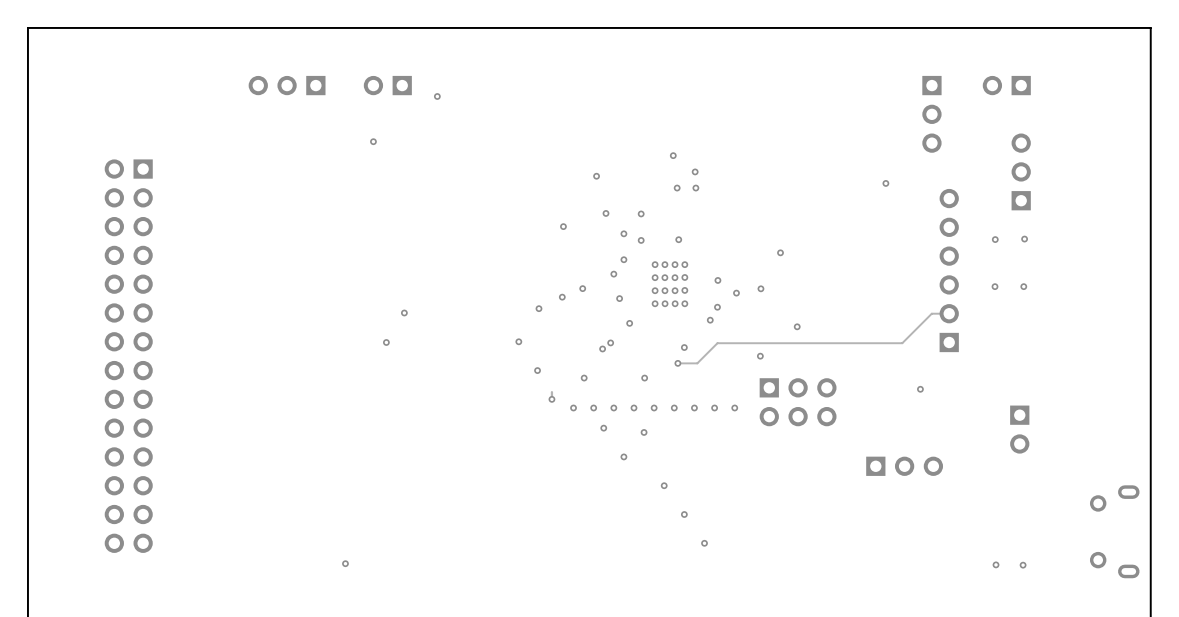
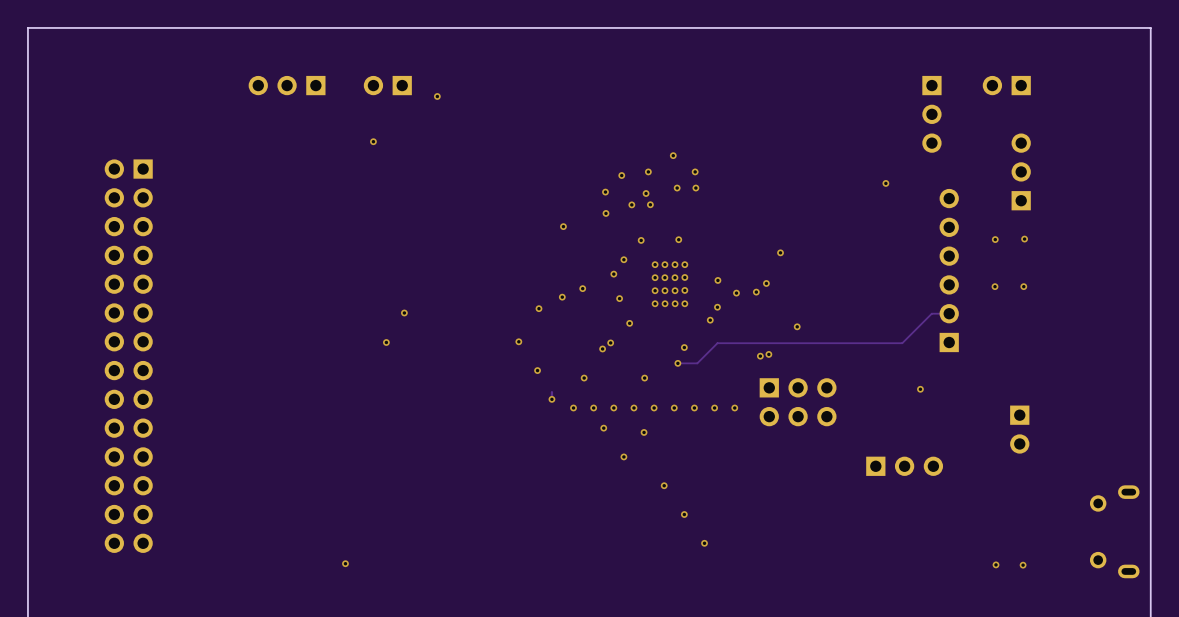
via: none -> (648, 171)
via: none -> (621, 175)
via: (596, 176) -> none
via: none -> (605, 192)
via: none -> (646, 193)
via: none -> (631, 204)
via: none -> (650, 204)
via: (641, 213) -> none
via: (623, 233) -> none
via: none -> (766, 283)
via: (760, 288) -> none
via: none -> (756, 292)
via: none -> (768, 354)

